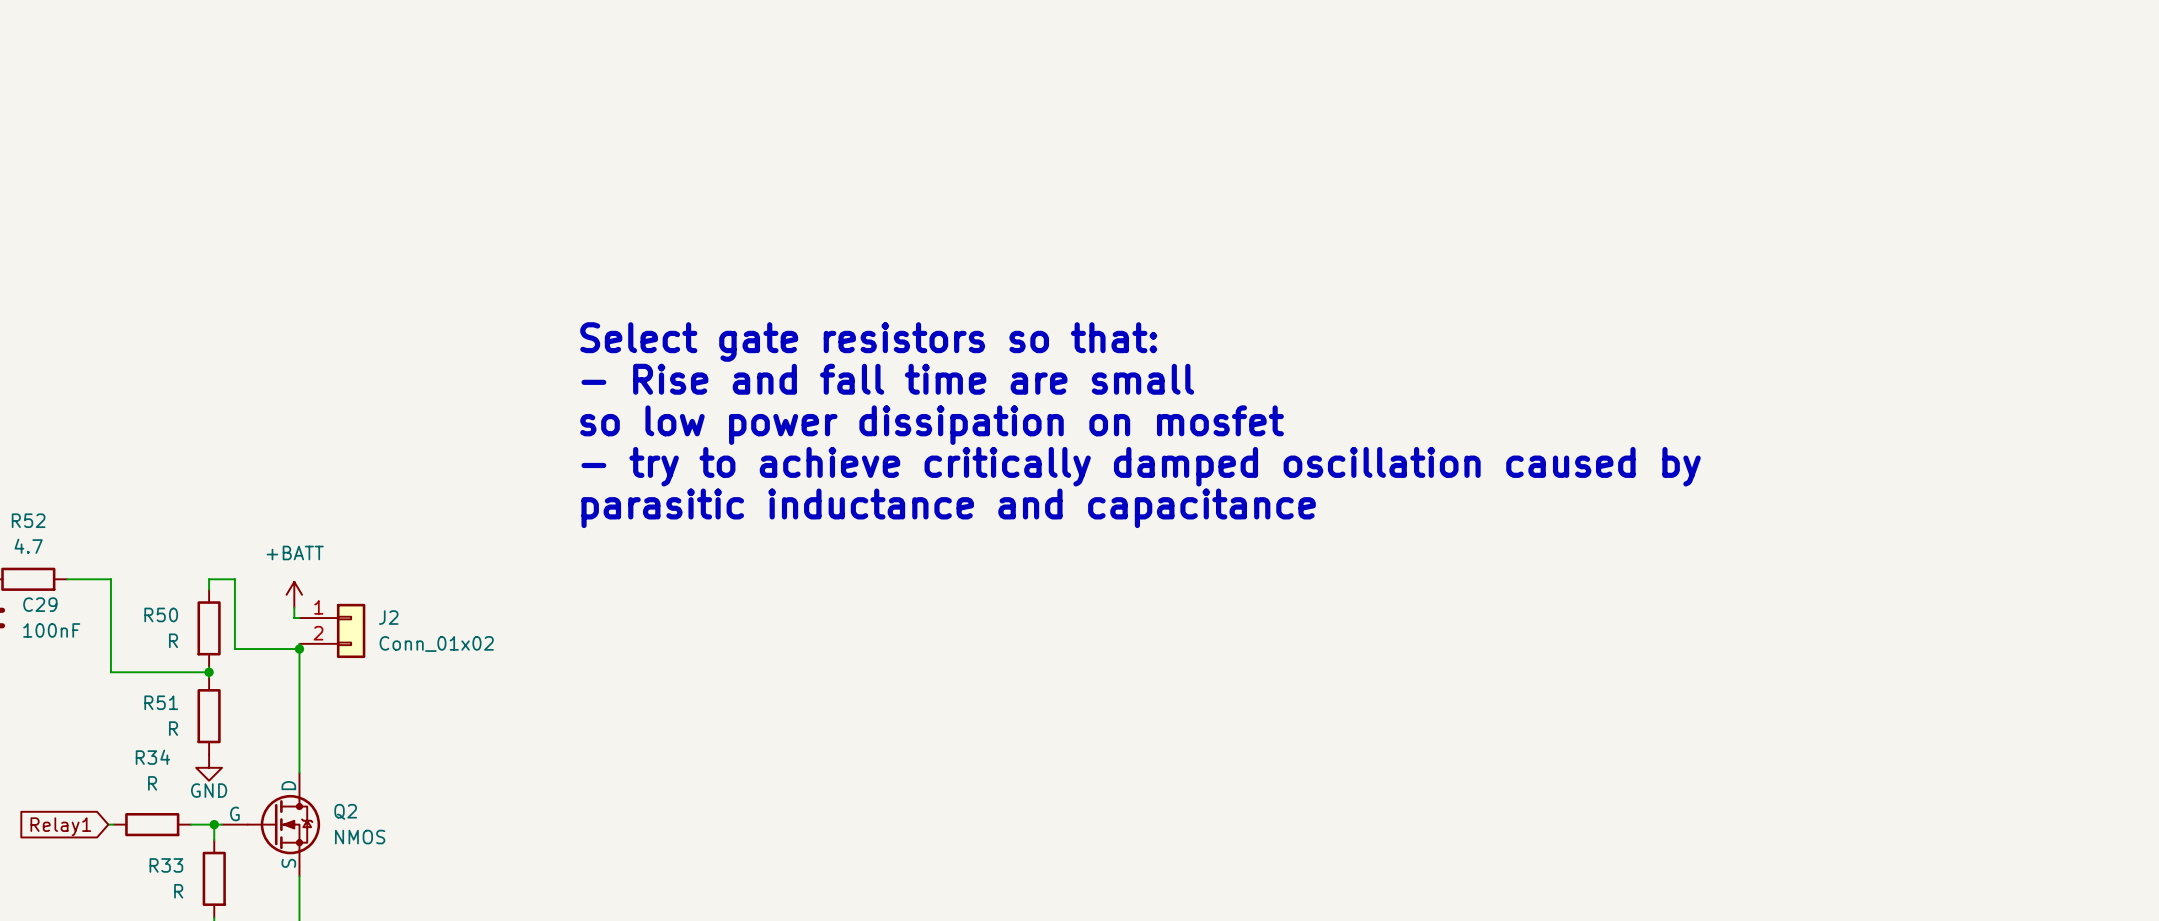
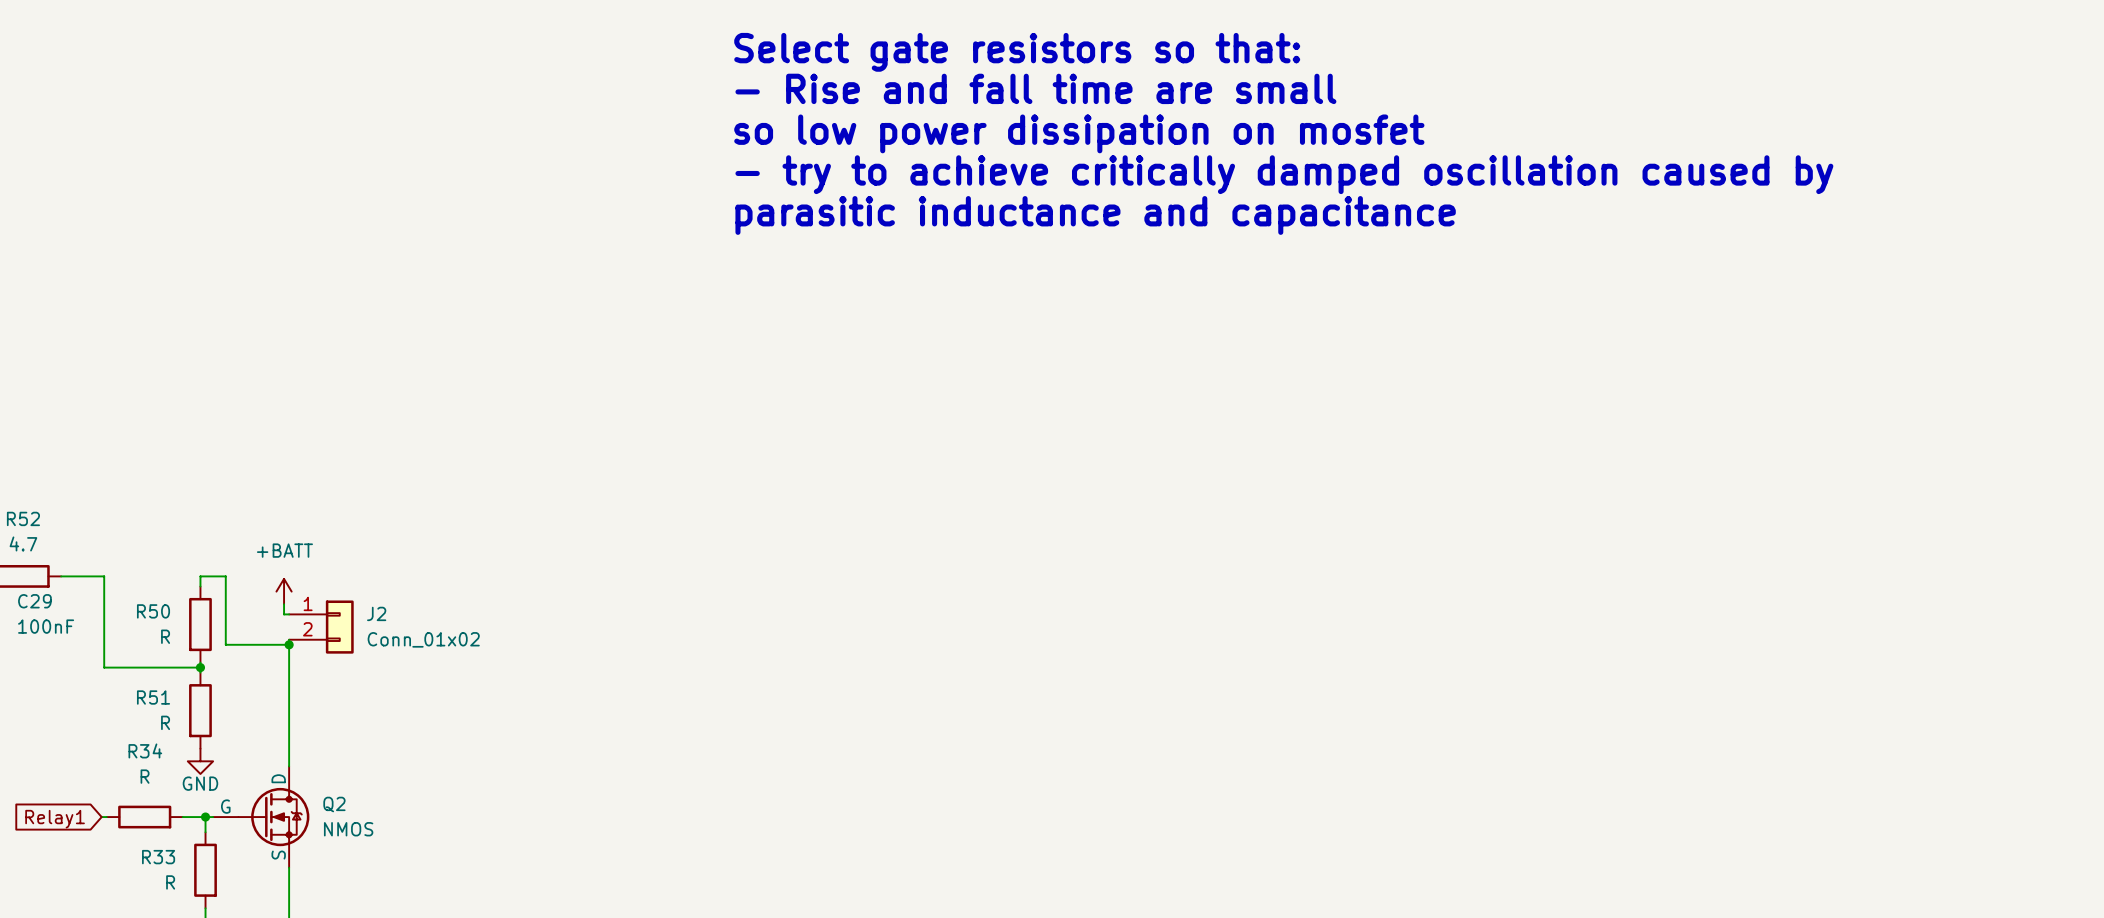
text: none -> Select gate resistors so that: (1017, 52)
text: none -> - Rise and fall time are small (1035, 88)
text: none -> so low power dissipation on mosfet (1079, 133)
text: none -> - try to achieve critically damped oscillation caused by (1284, 174)
text: none -> parasitic inductance and capacitance (1095, 215)
text: Select gate resistors so that: (868, 341) -> none
text: - Rise and fall time are small (887, 379) -> none
text: so low power dissipation on mosfet (932, 425) -> none
text: - try to achieve critically damped oscillation caused by (1141, 466) -> none
text: parasitic inductance and capacitance (948, 508) -> none

